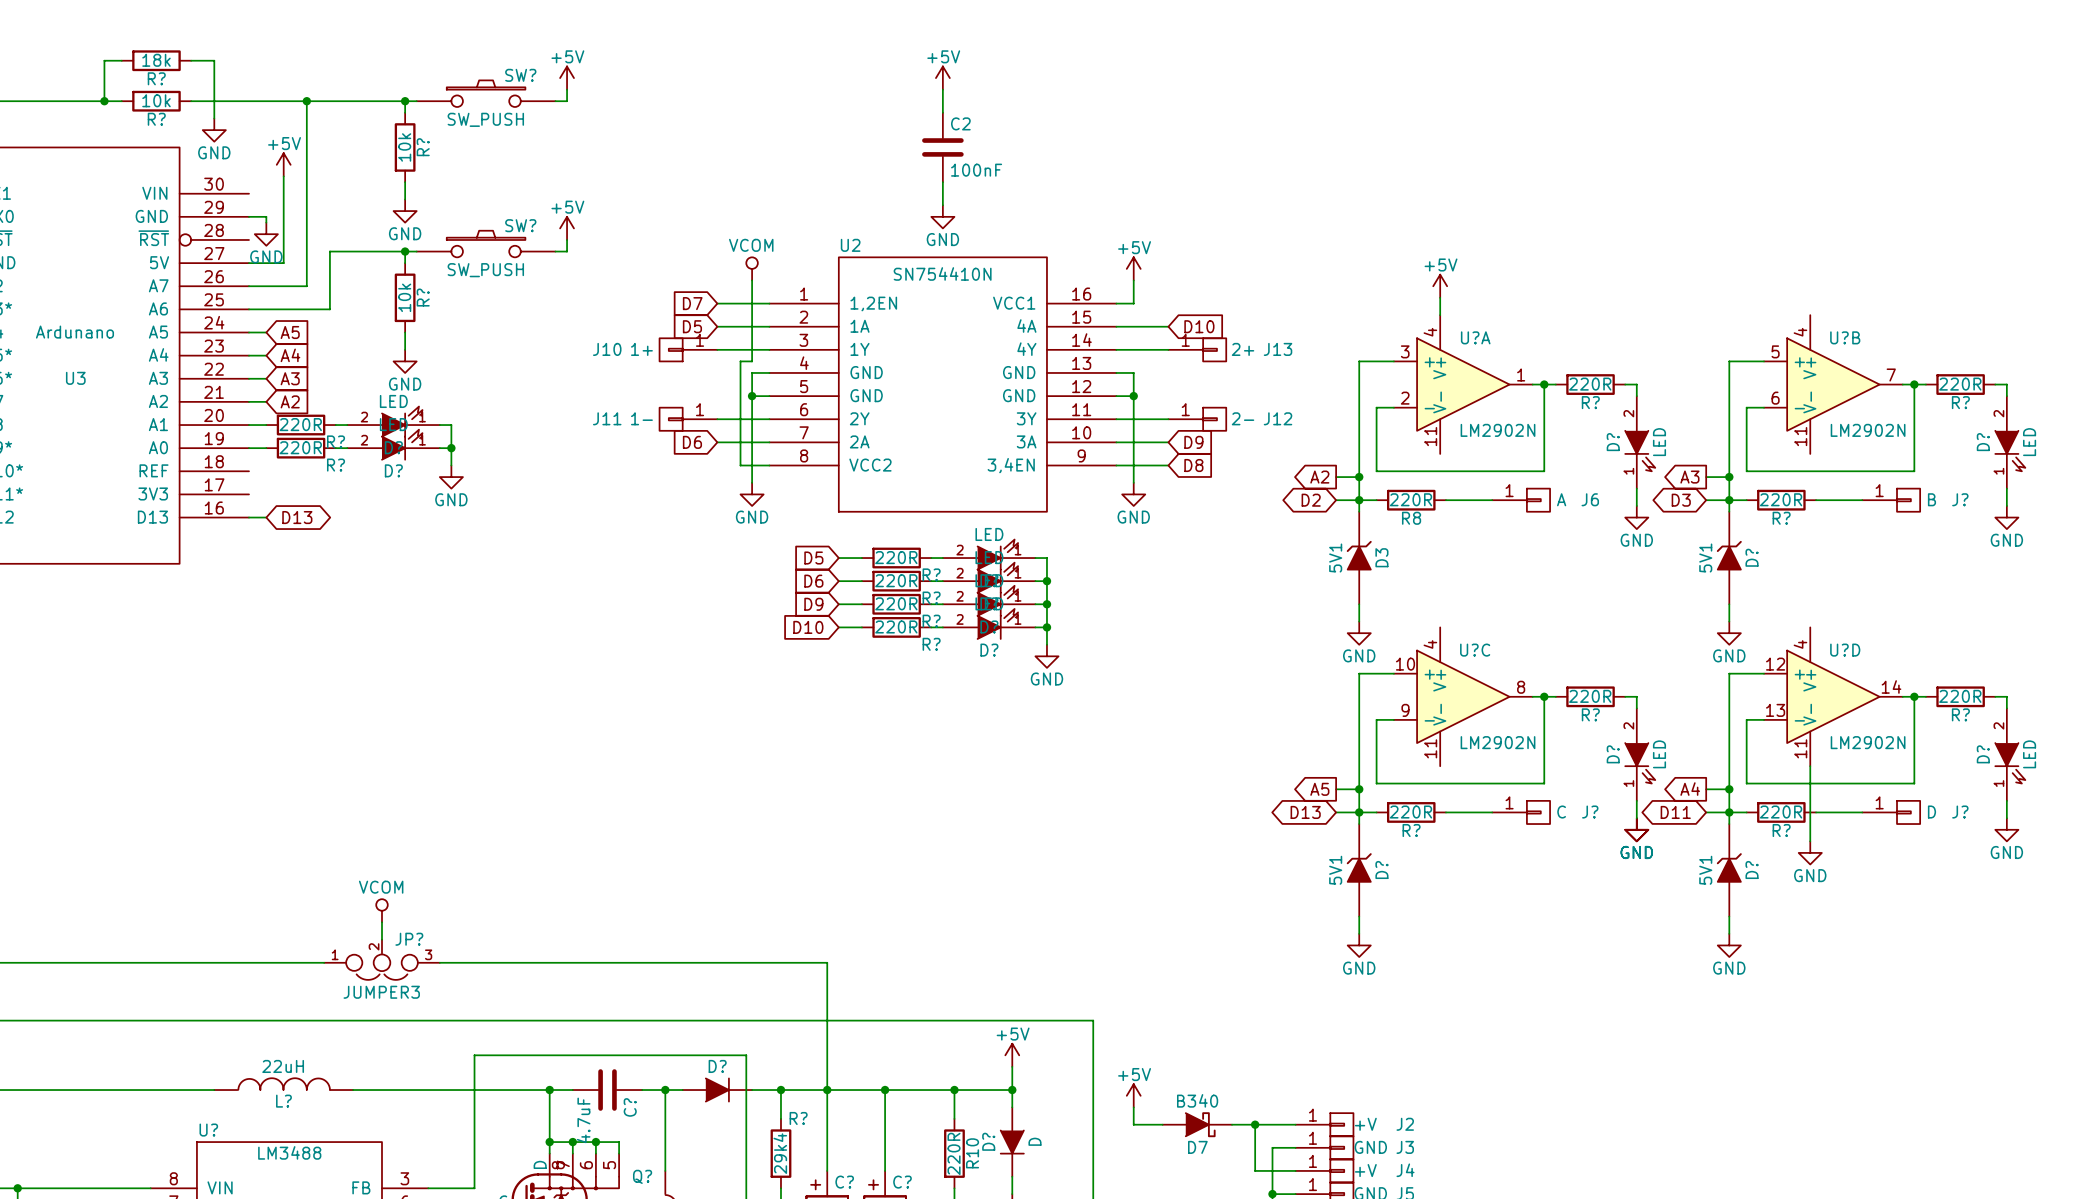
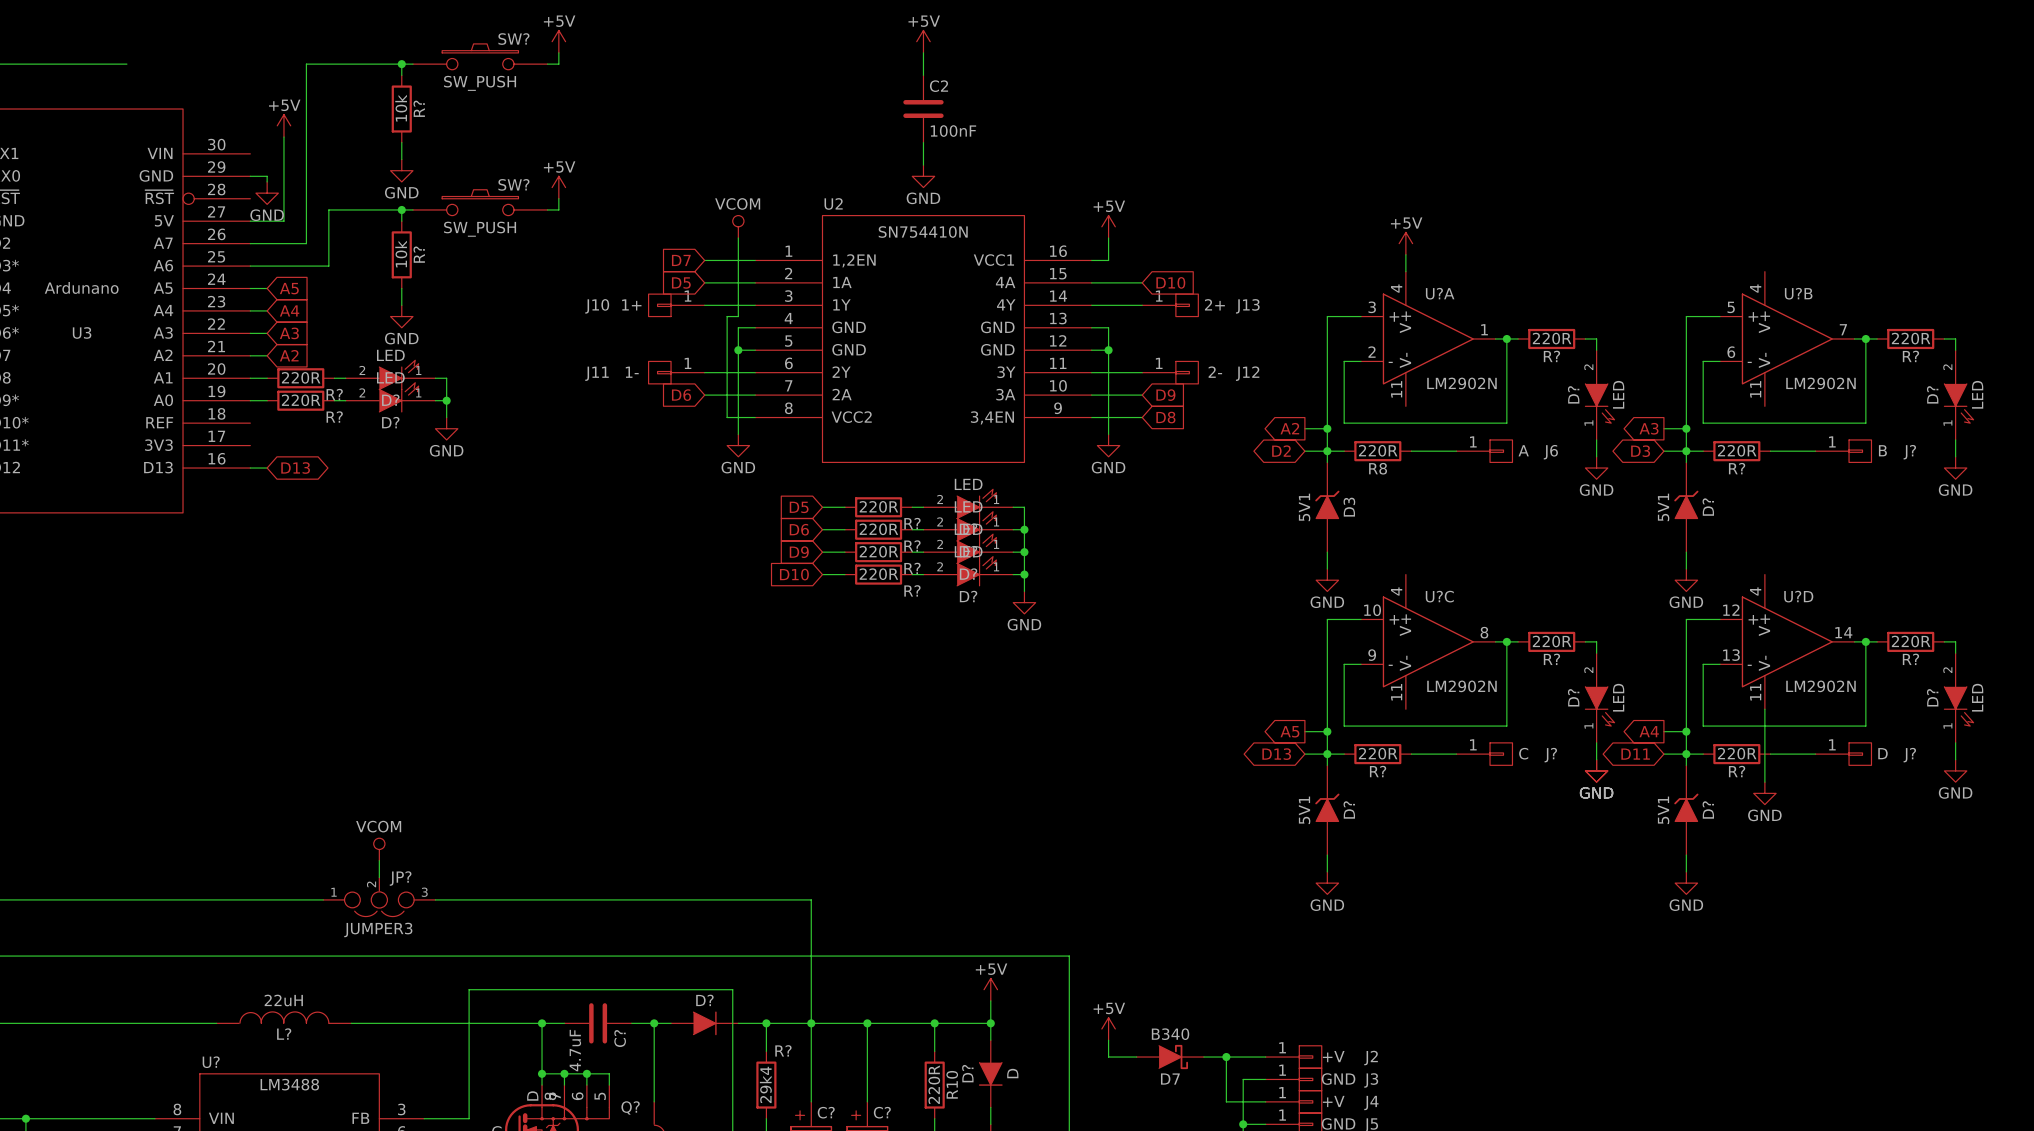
wire: (121, 60) (104, 60) (104, 101) -> none
R?: 18k (156, 60) -> none
wire: (191, 60) (214, 60) (214, 118) -> none
junction: (104, 101) -> none
R?: 10k (156, 101) -> none
wire: (191, 101) (306, 101) -> none
junction: (306, 101) -> none
power symbol: GND (214, 130) -> none

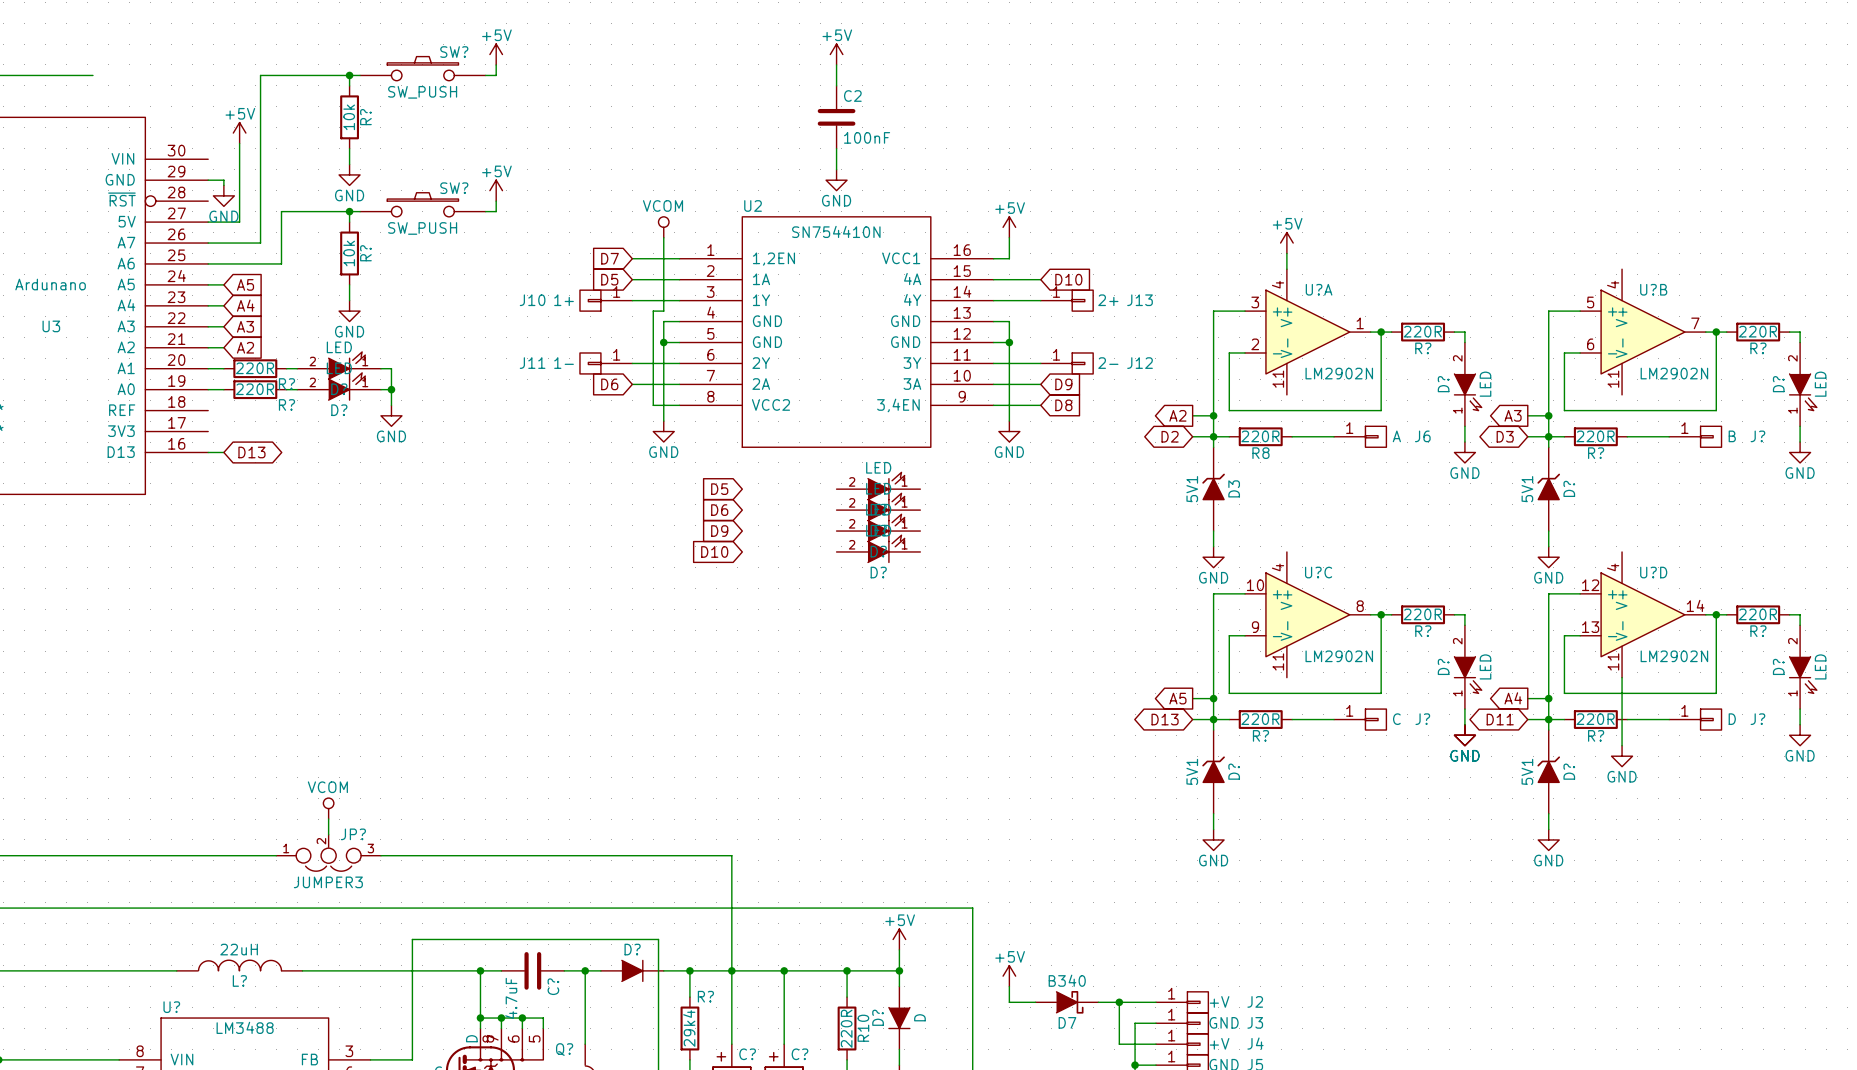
wire: (822, 507) (844, 507) -> none
R?: 220R (878, 507) -> none
wire: (912, 507) (923, 507) -> none
wire: (1013, 507) (1024, 507) (1024, 591) -> none
wire: (822, 529) (844, 529) -> none
R?: 220R (878, 529) -> none
wire: (912, 529) (923, 529) -> none
wire: (1013, 529) (1024, 529) -> none
junction: (1024, 529) -> none
wire: (822, 552) (844, 552) -> none
R?: 220R (878, 552) -> none
wire: (912, 552) (923, 552) -> none
wire: (1013, 552) (1024, 552) -> none
junction: (1024, 552) -> none
wire: (822, 574) (844, 574) -> none
R?: 220R (878, 574) -> none
wire: (912, 574) (923, 574) -> none
wire: (1013, 574) (1024, 574) -> none
junction: (1024, 574) -> none
power symbol: GND (1024, 602) -> none

